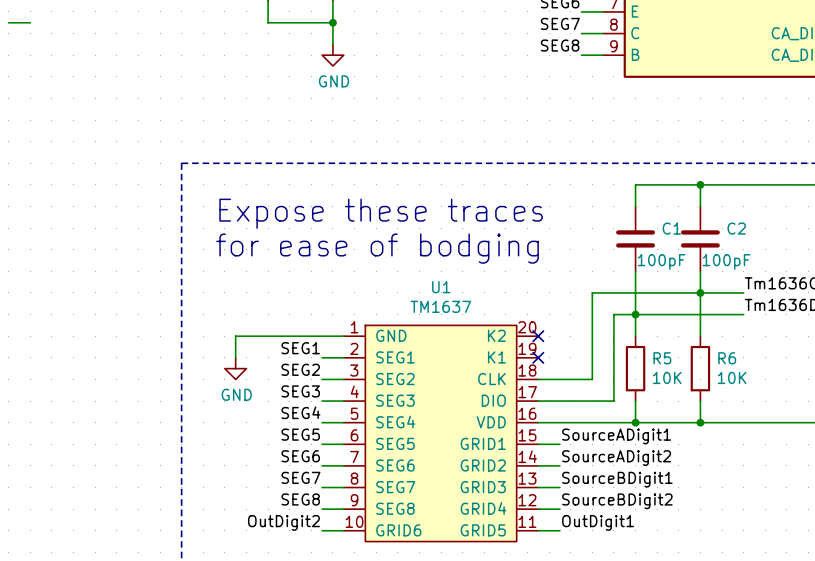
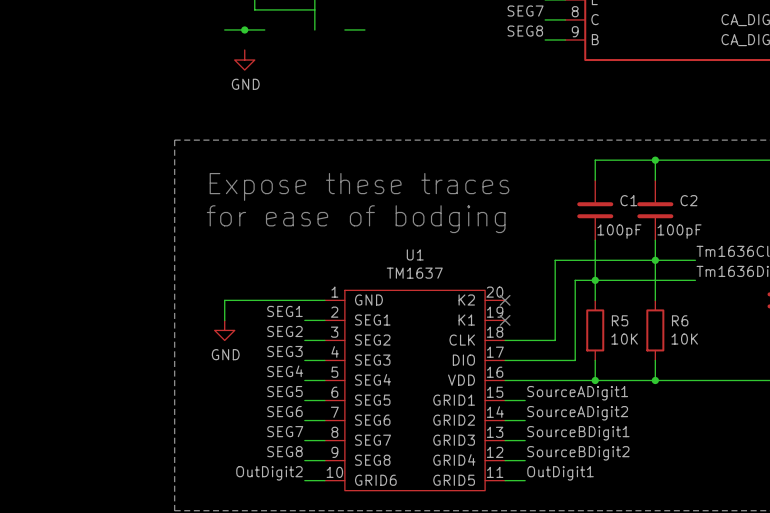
wire: (8, 22) (30, 22) -> none
junction: (332, 22) -> none
wire: none -> (224, 29) (264, 29)
junction: none -> (244, 29)
wire: none -> (344, 29) (364, 29)
power symbol position: GND (332, 55) -> GND (244, 60)

